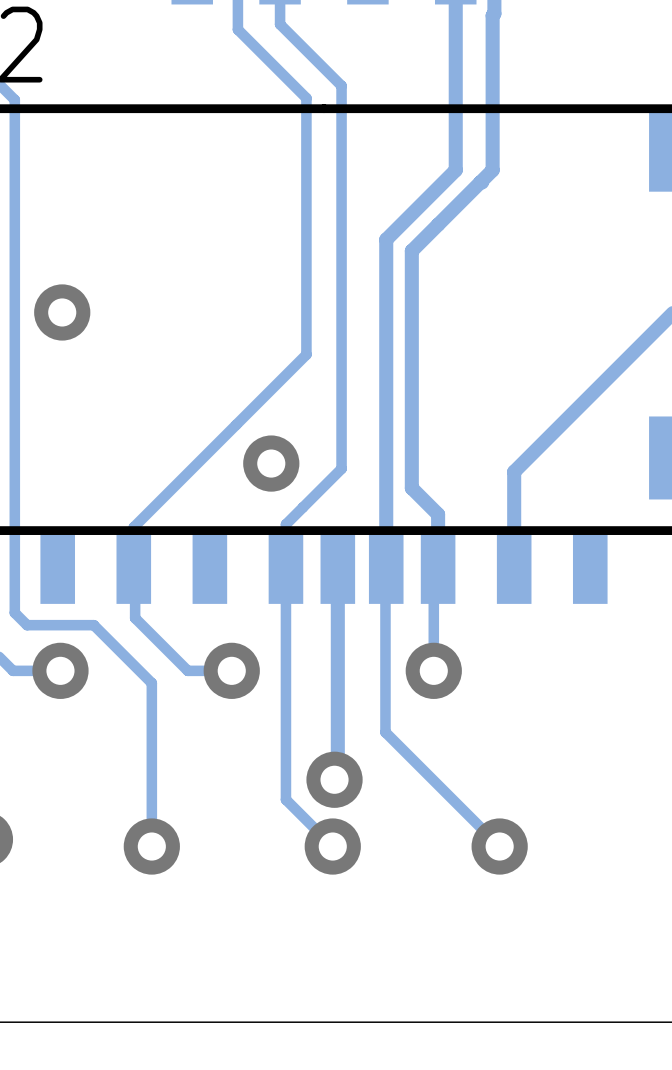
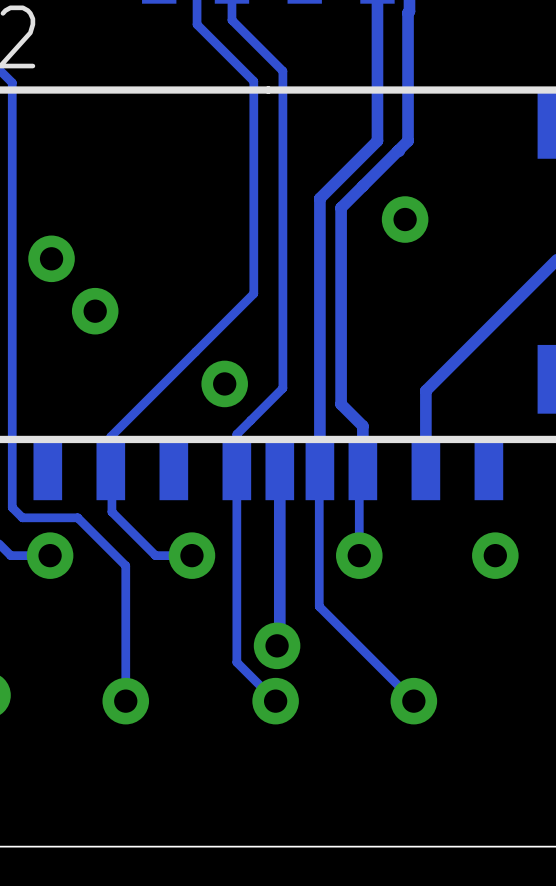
via: none -> (405, 219)
via: none -> (95, 311)
via: none -> (495, 555)

